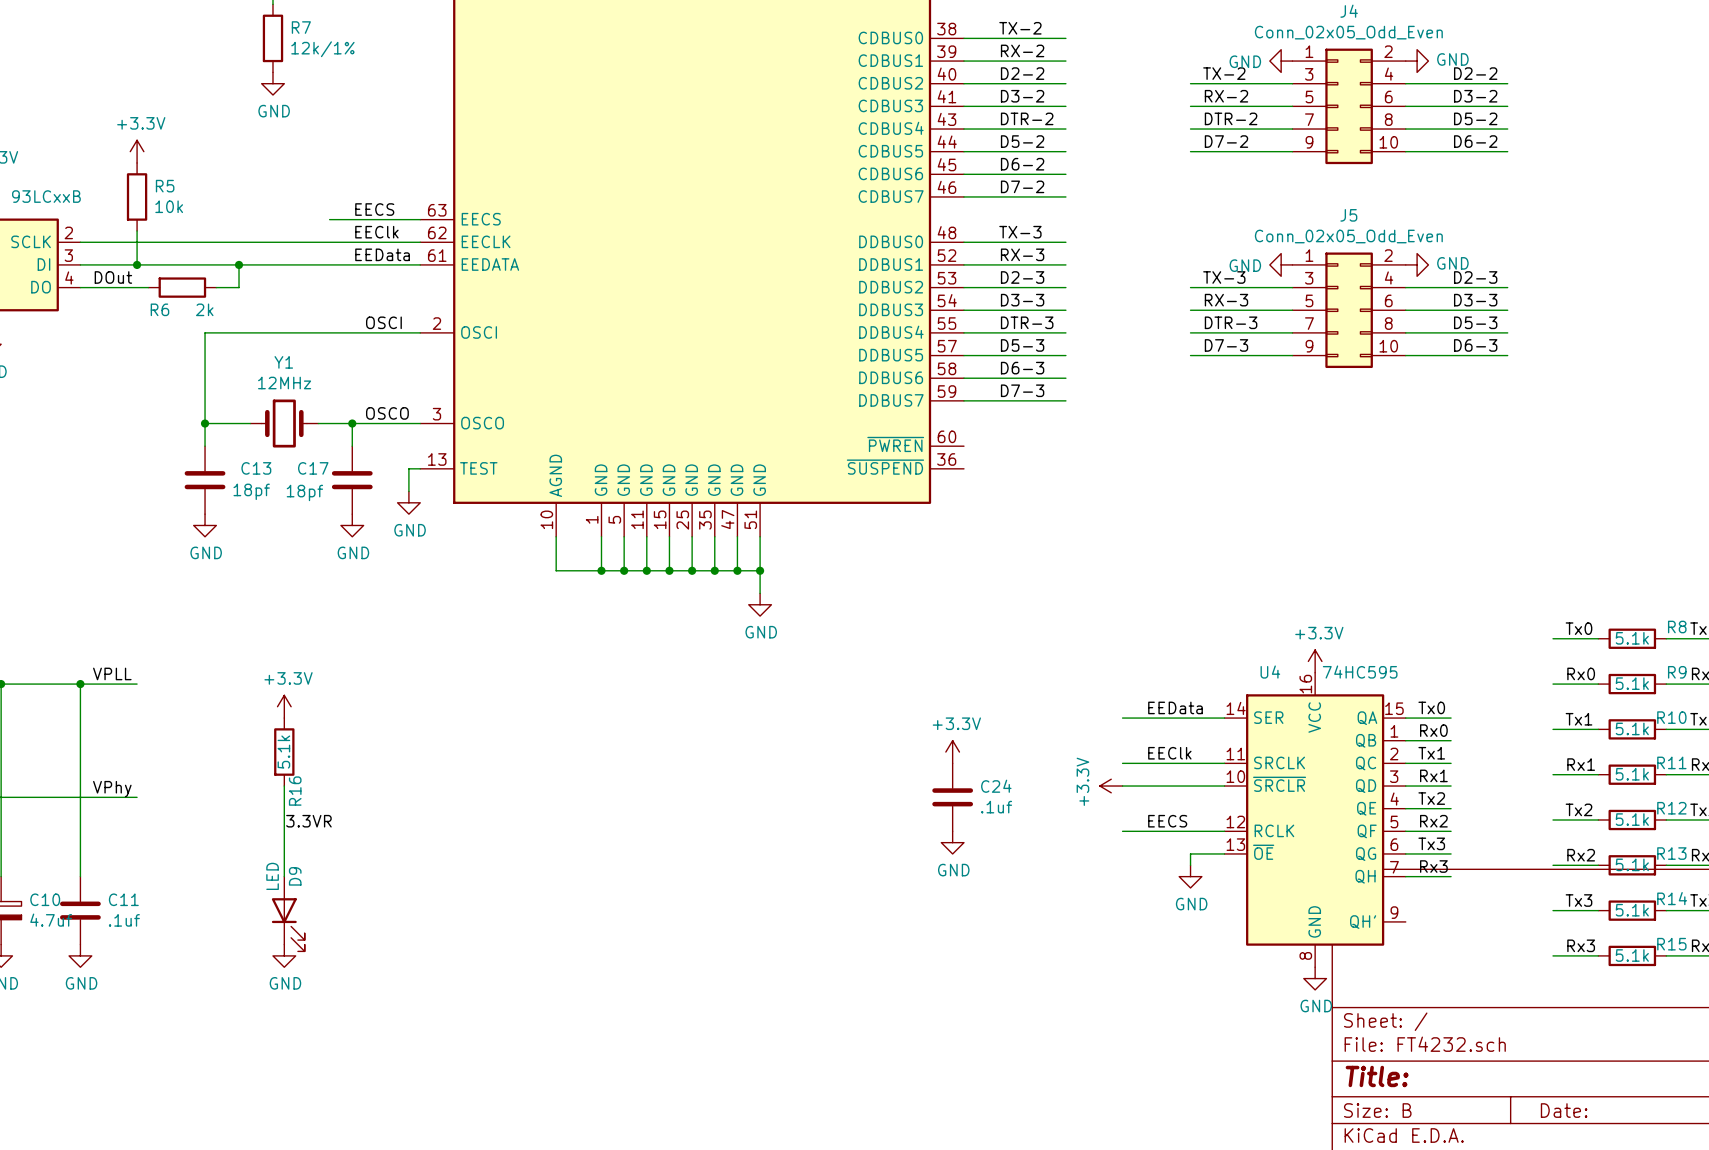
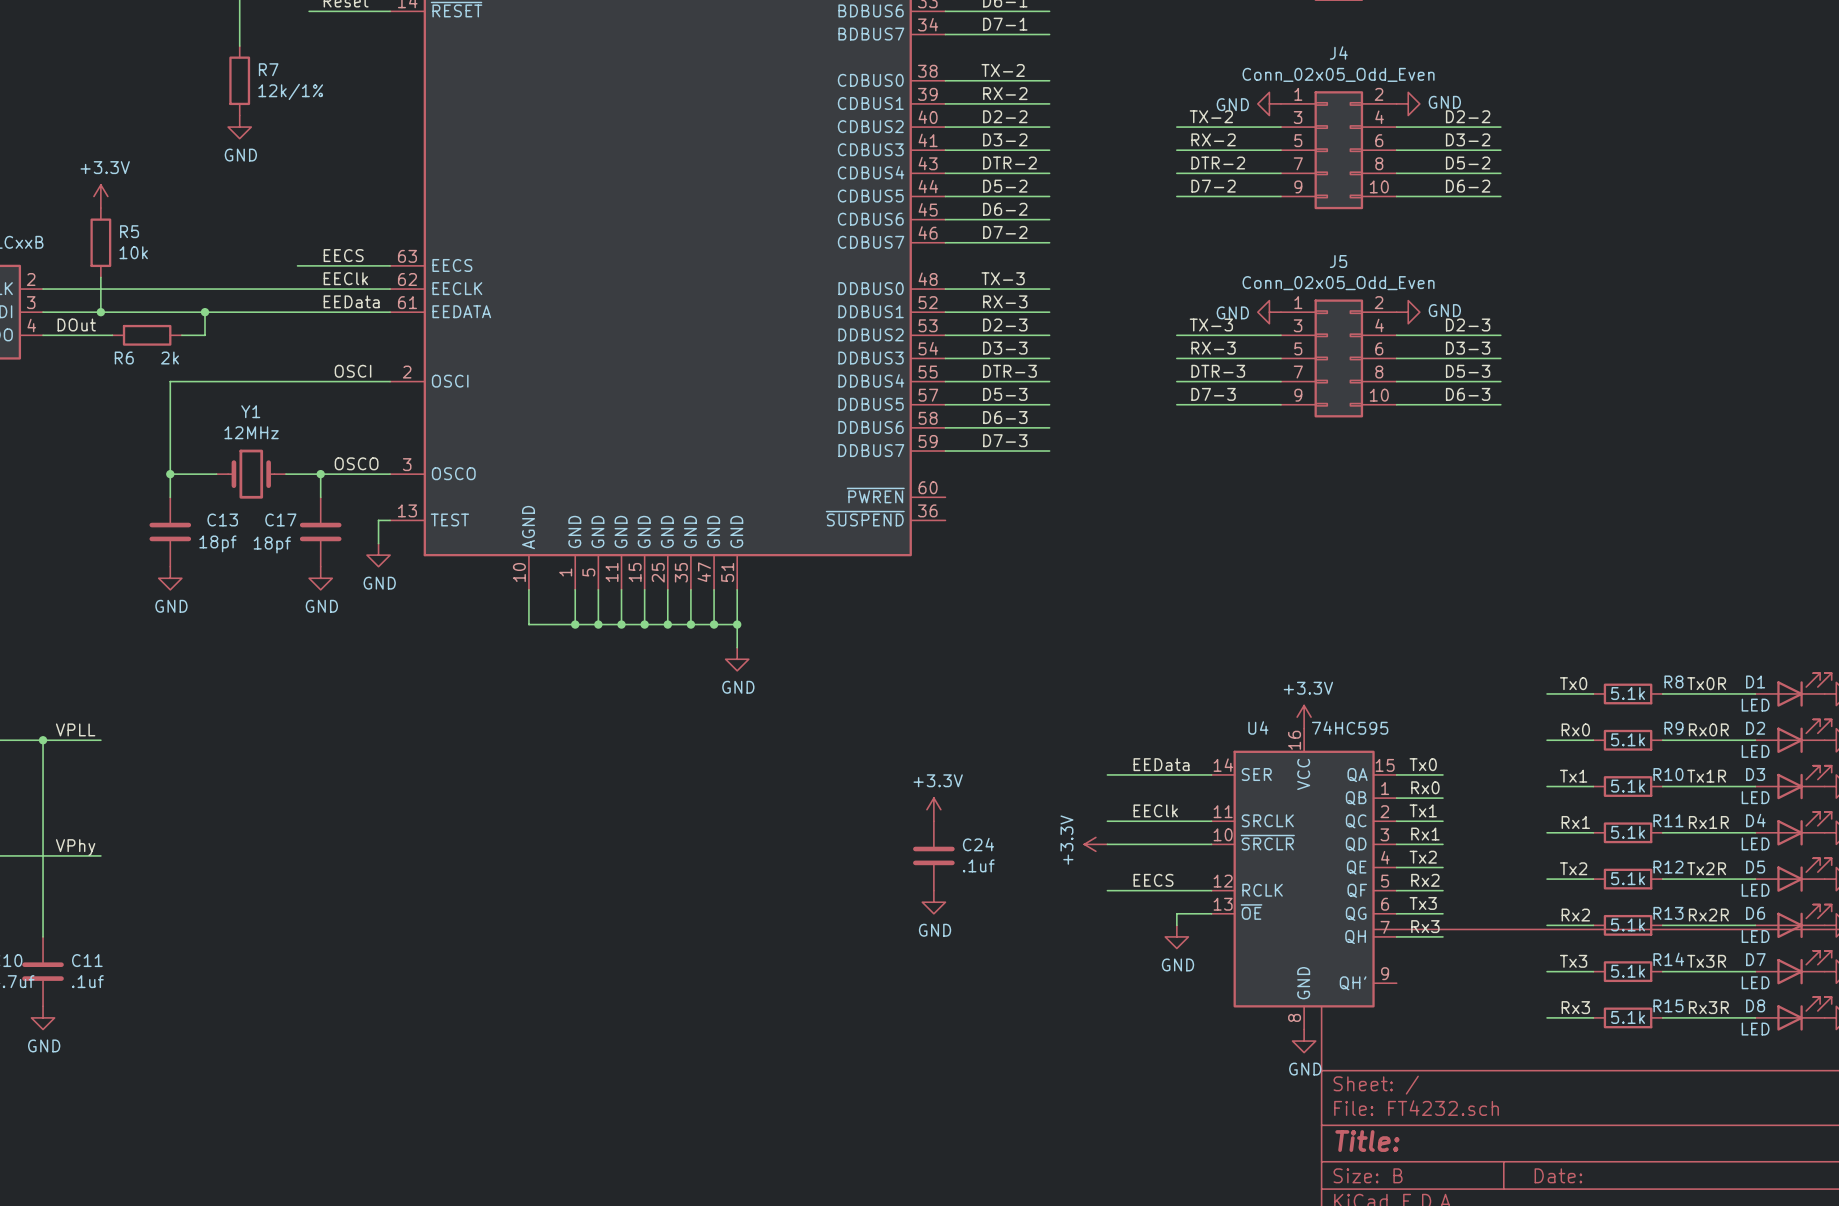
power symbol: +3.3V (284, 706) -> none
R16: 5.1k (284, 752) -> none
wire: (284, 786) (284, 876) -> none
label: 3.3VR (308, 821) -> none
D9: LED (288, 914) -> none
power symbol: GND (284, 955) -> none

